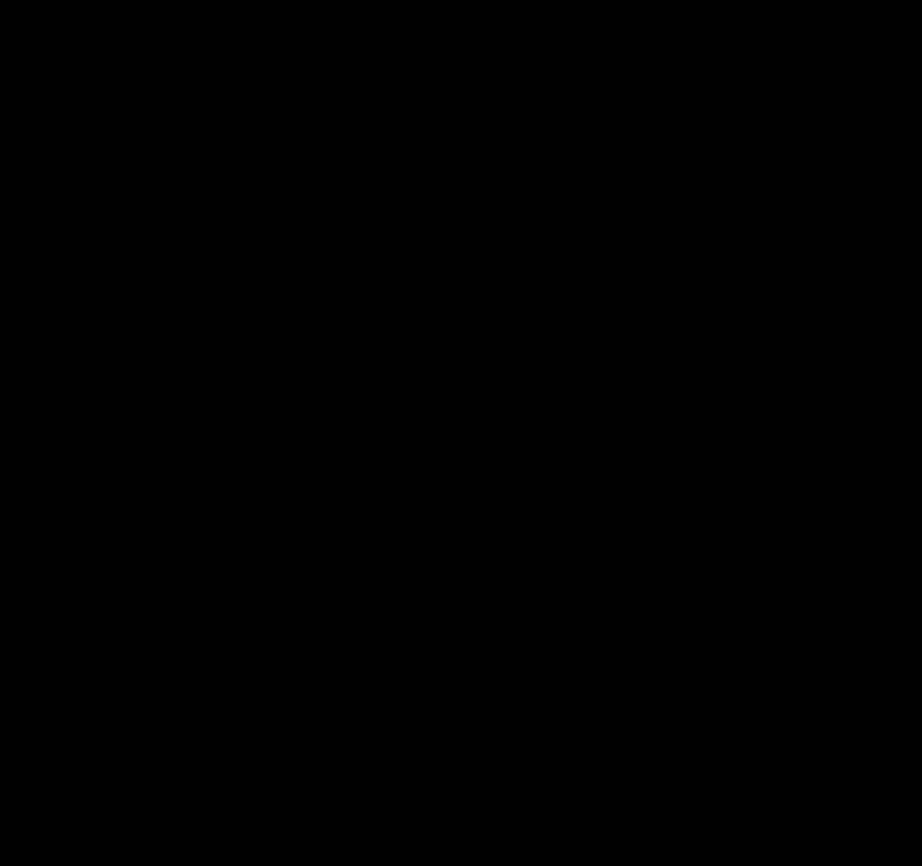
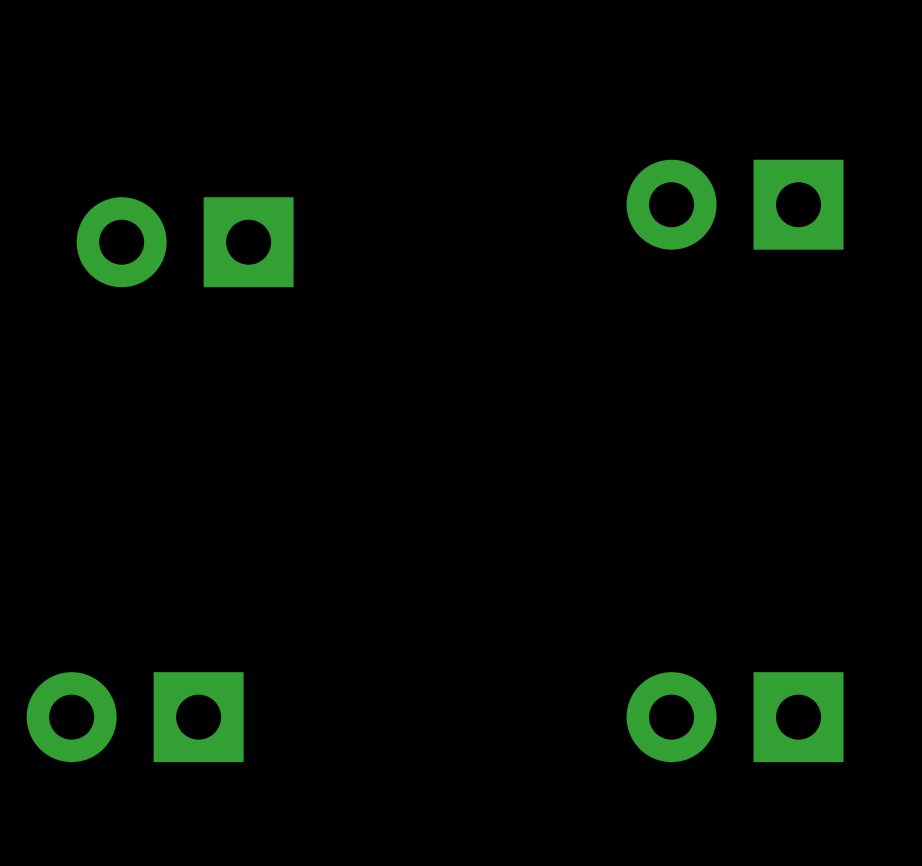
part: none -> (735, 204)
part: none -> (185, 242)
part: none -> (135, 717)
part: none -> (735, 717)

